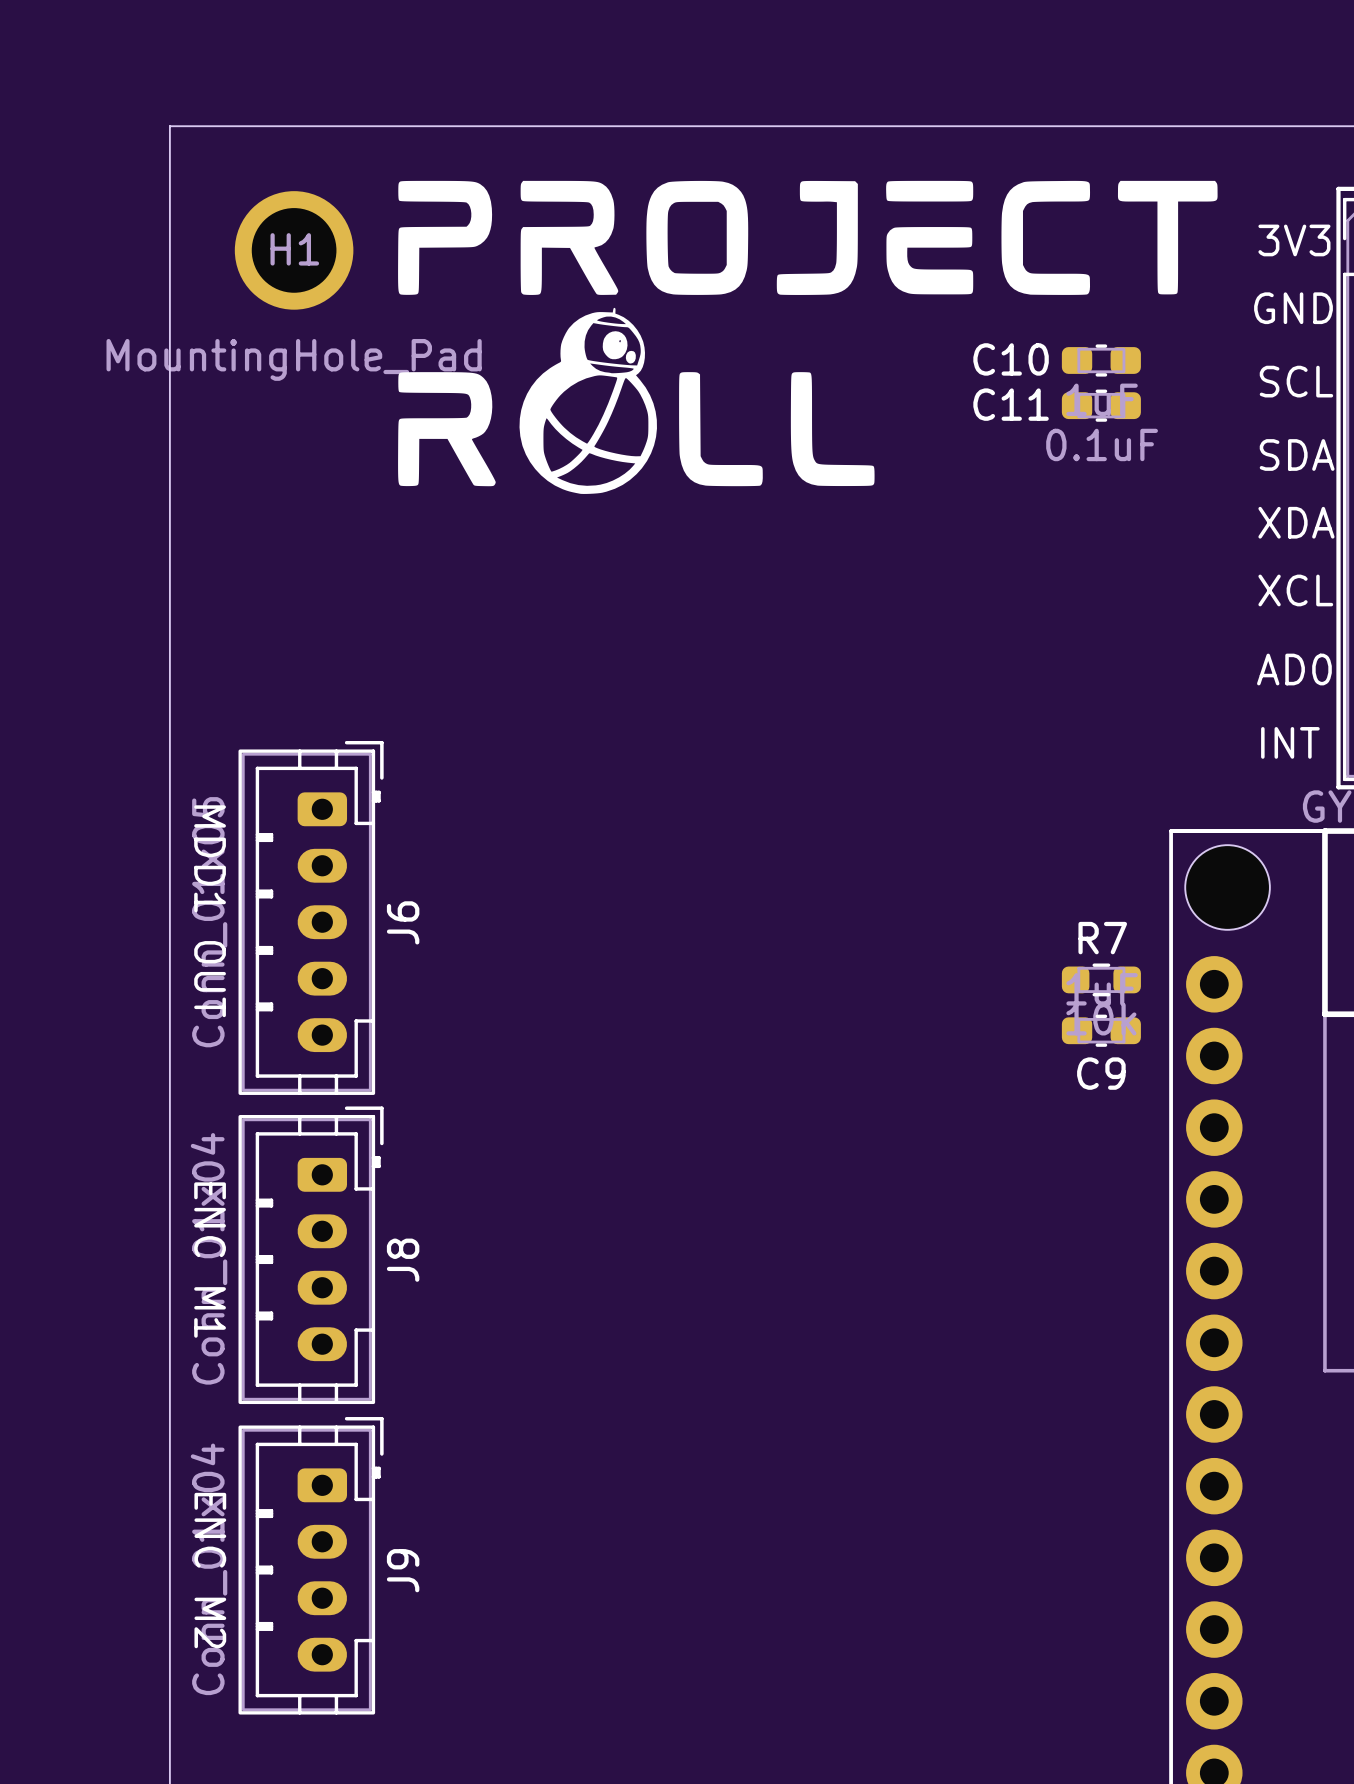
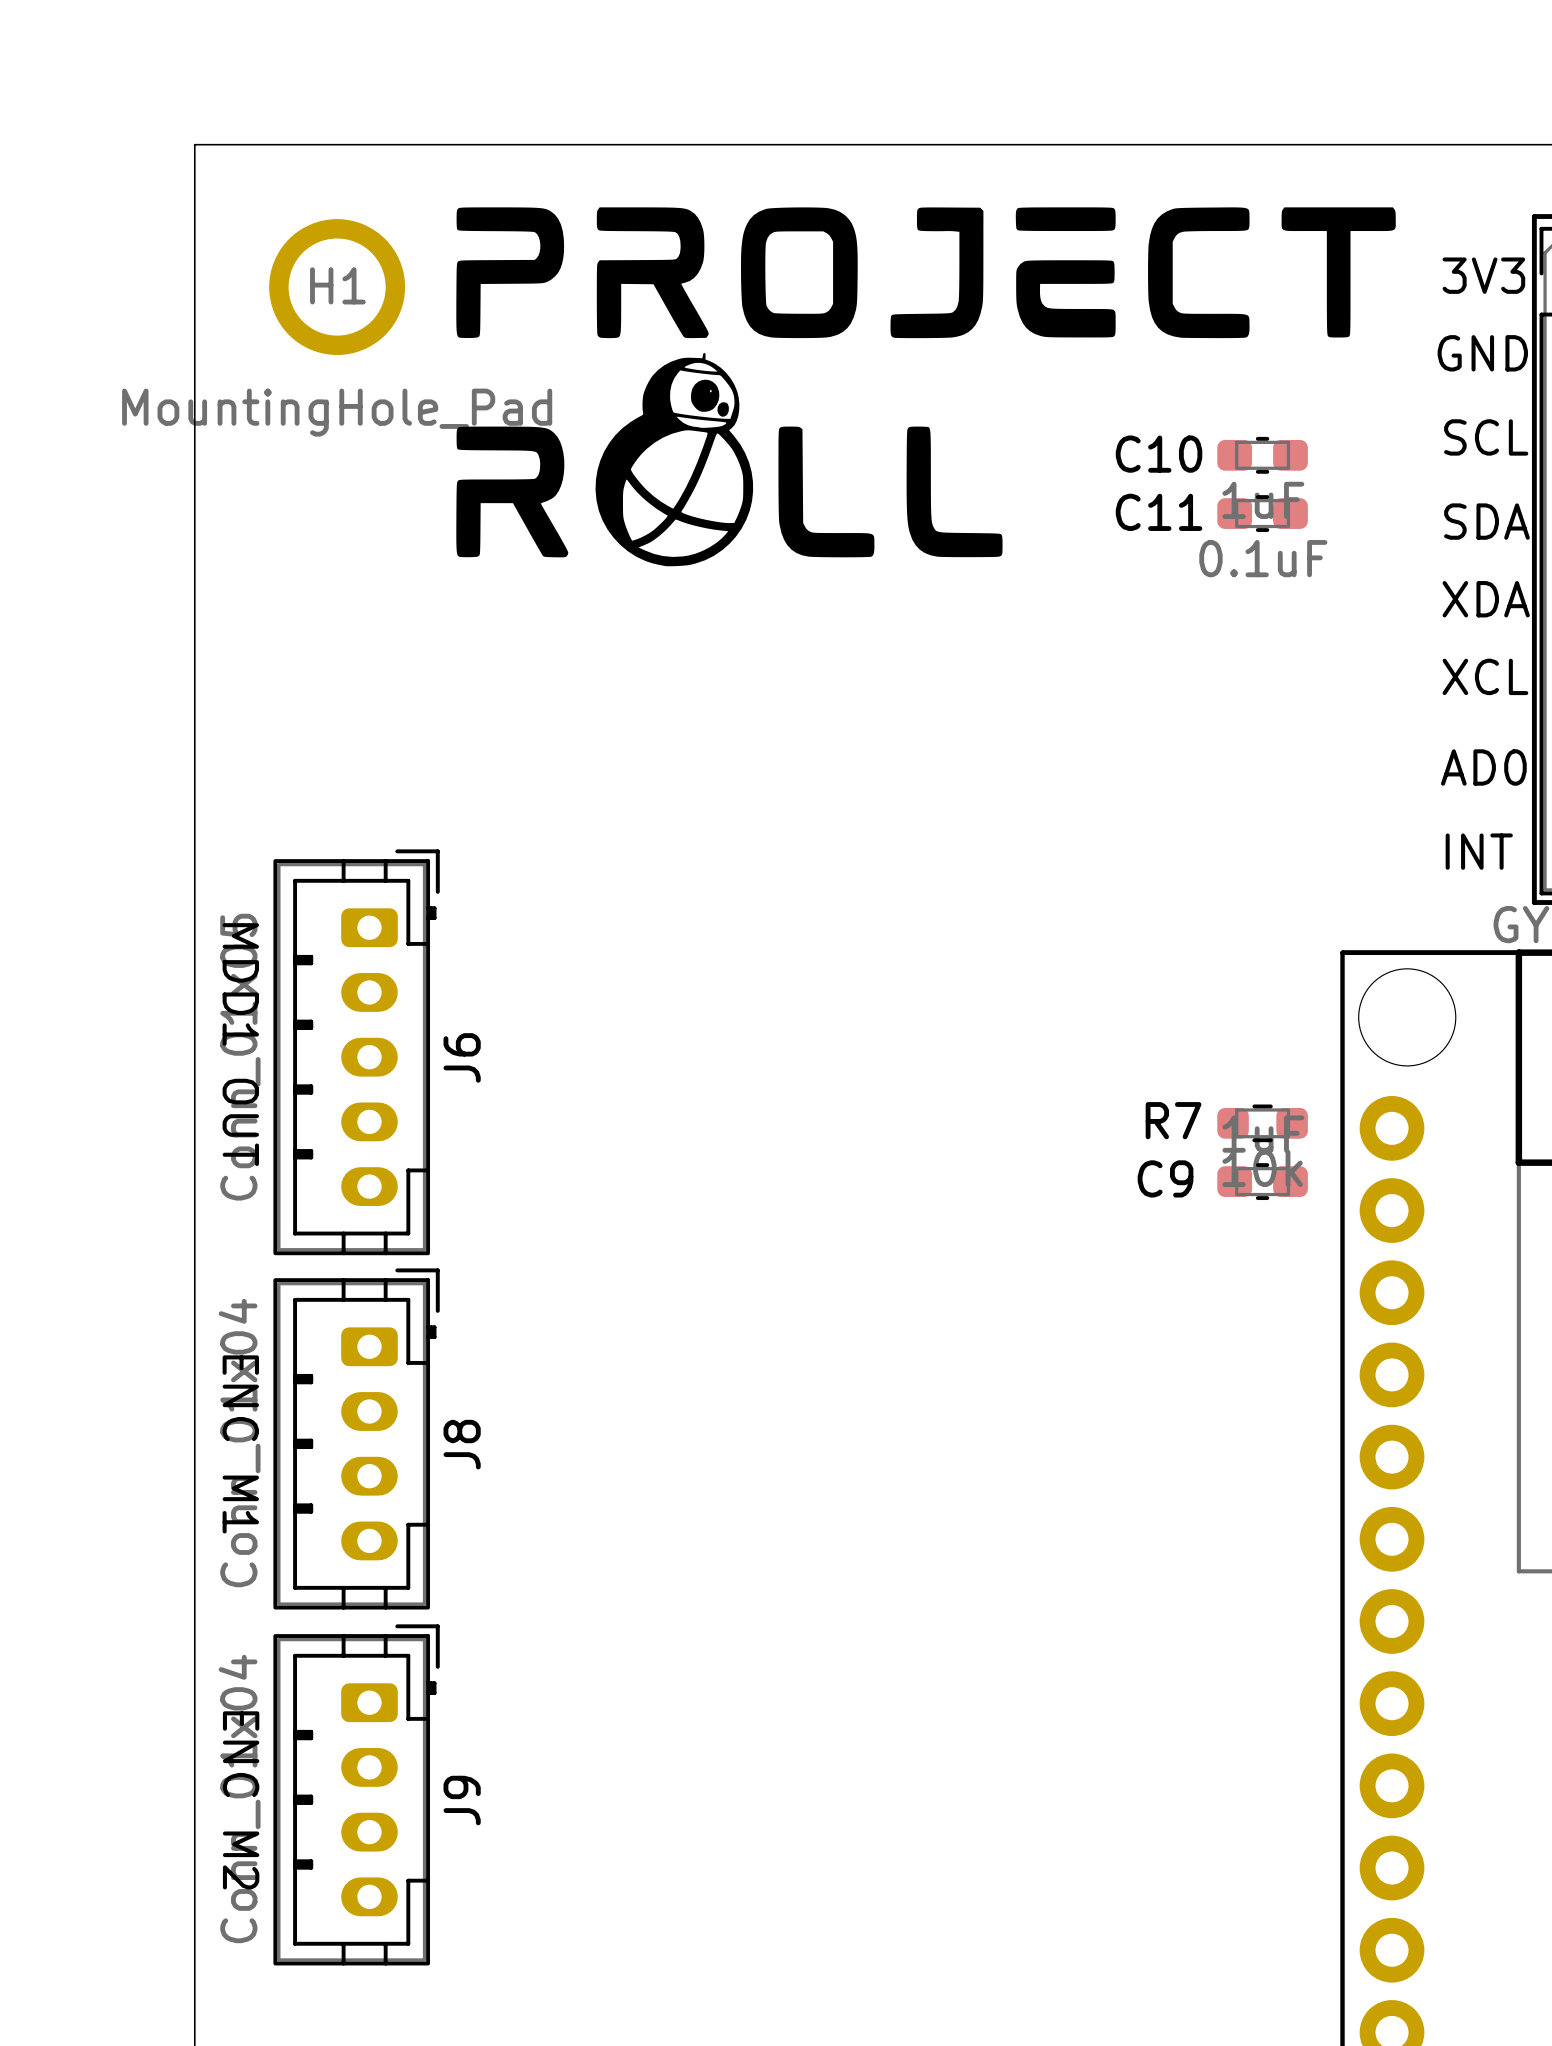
C10 position: (1101, 360) -> (1262, 455)
C11 position: (1101, 405) -> (1262, 513)
R7 name position: R7 (1102, 938) -> R7 (1173, 1120)
C9 name position: C9 (1101, 1073) -> C9 (1165, 1178)

